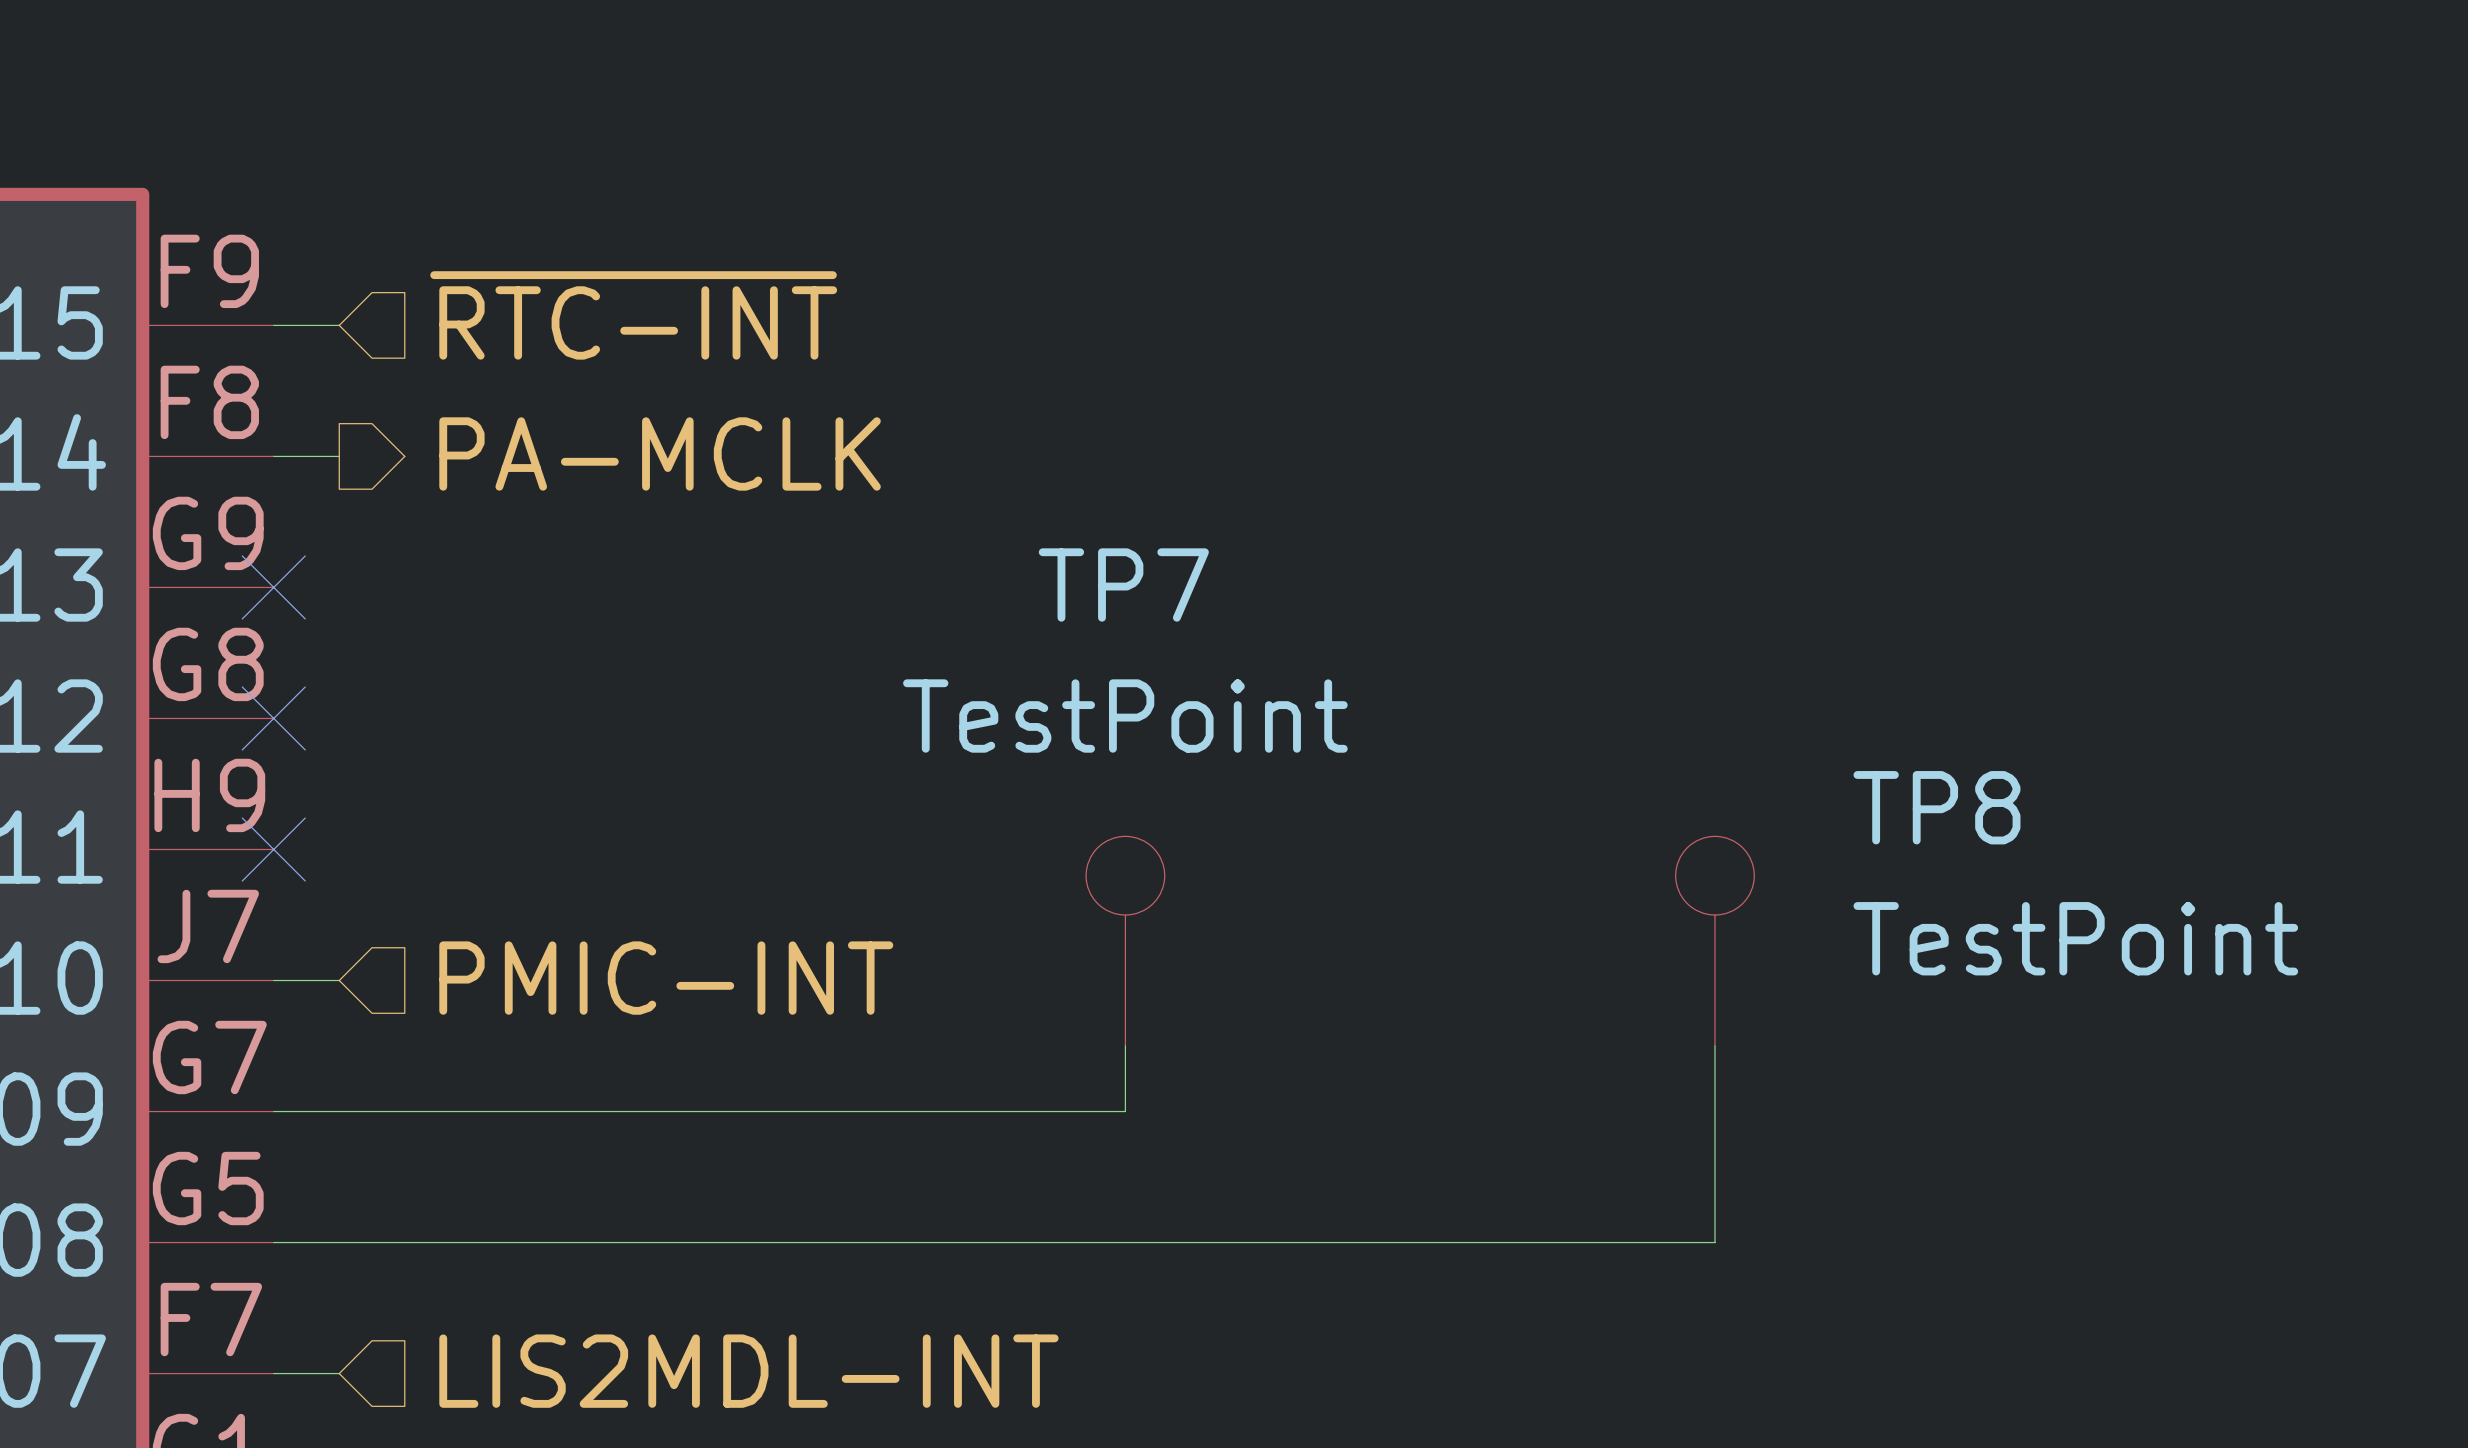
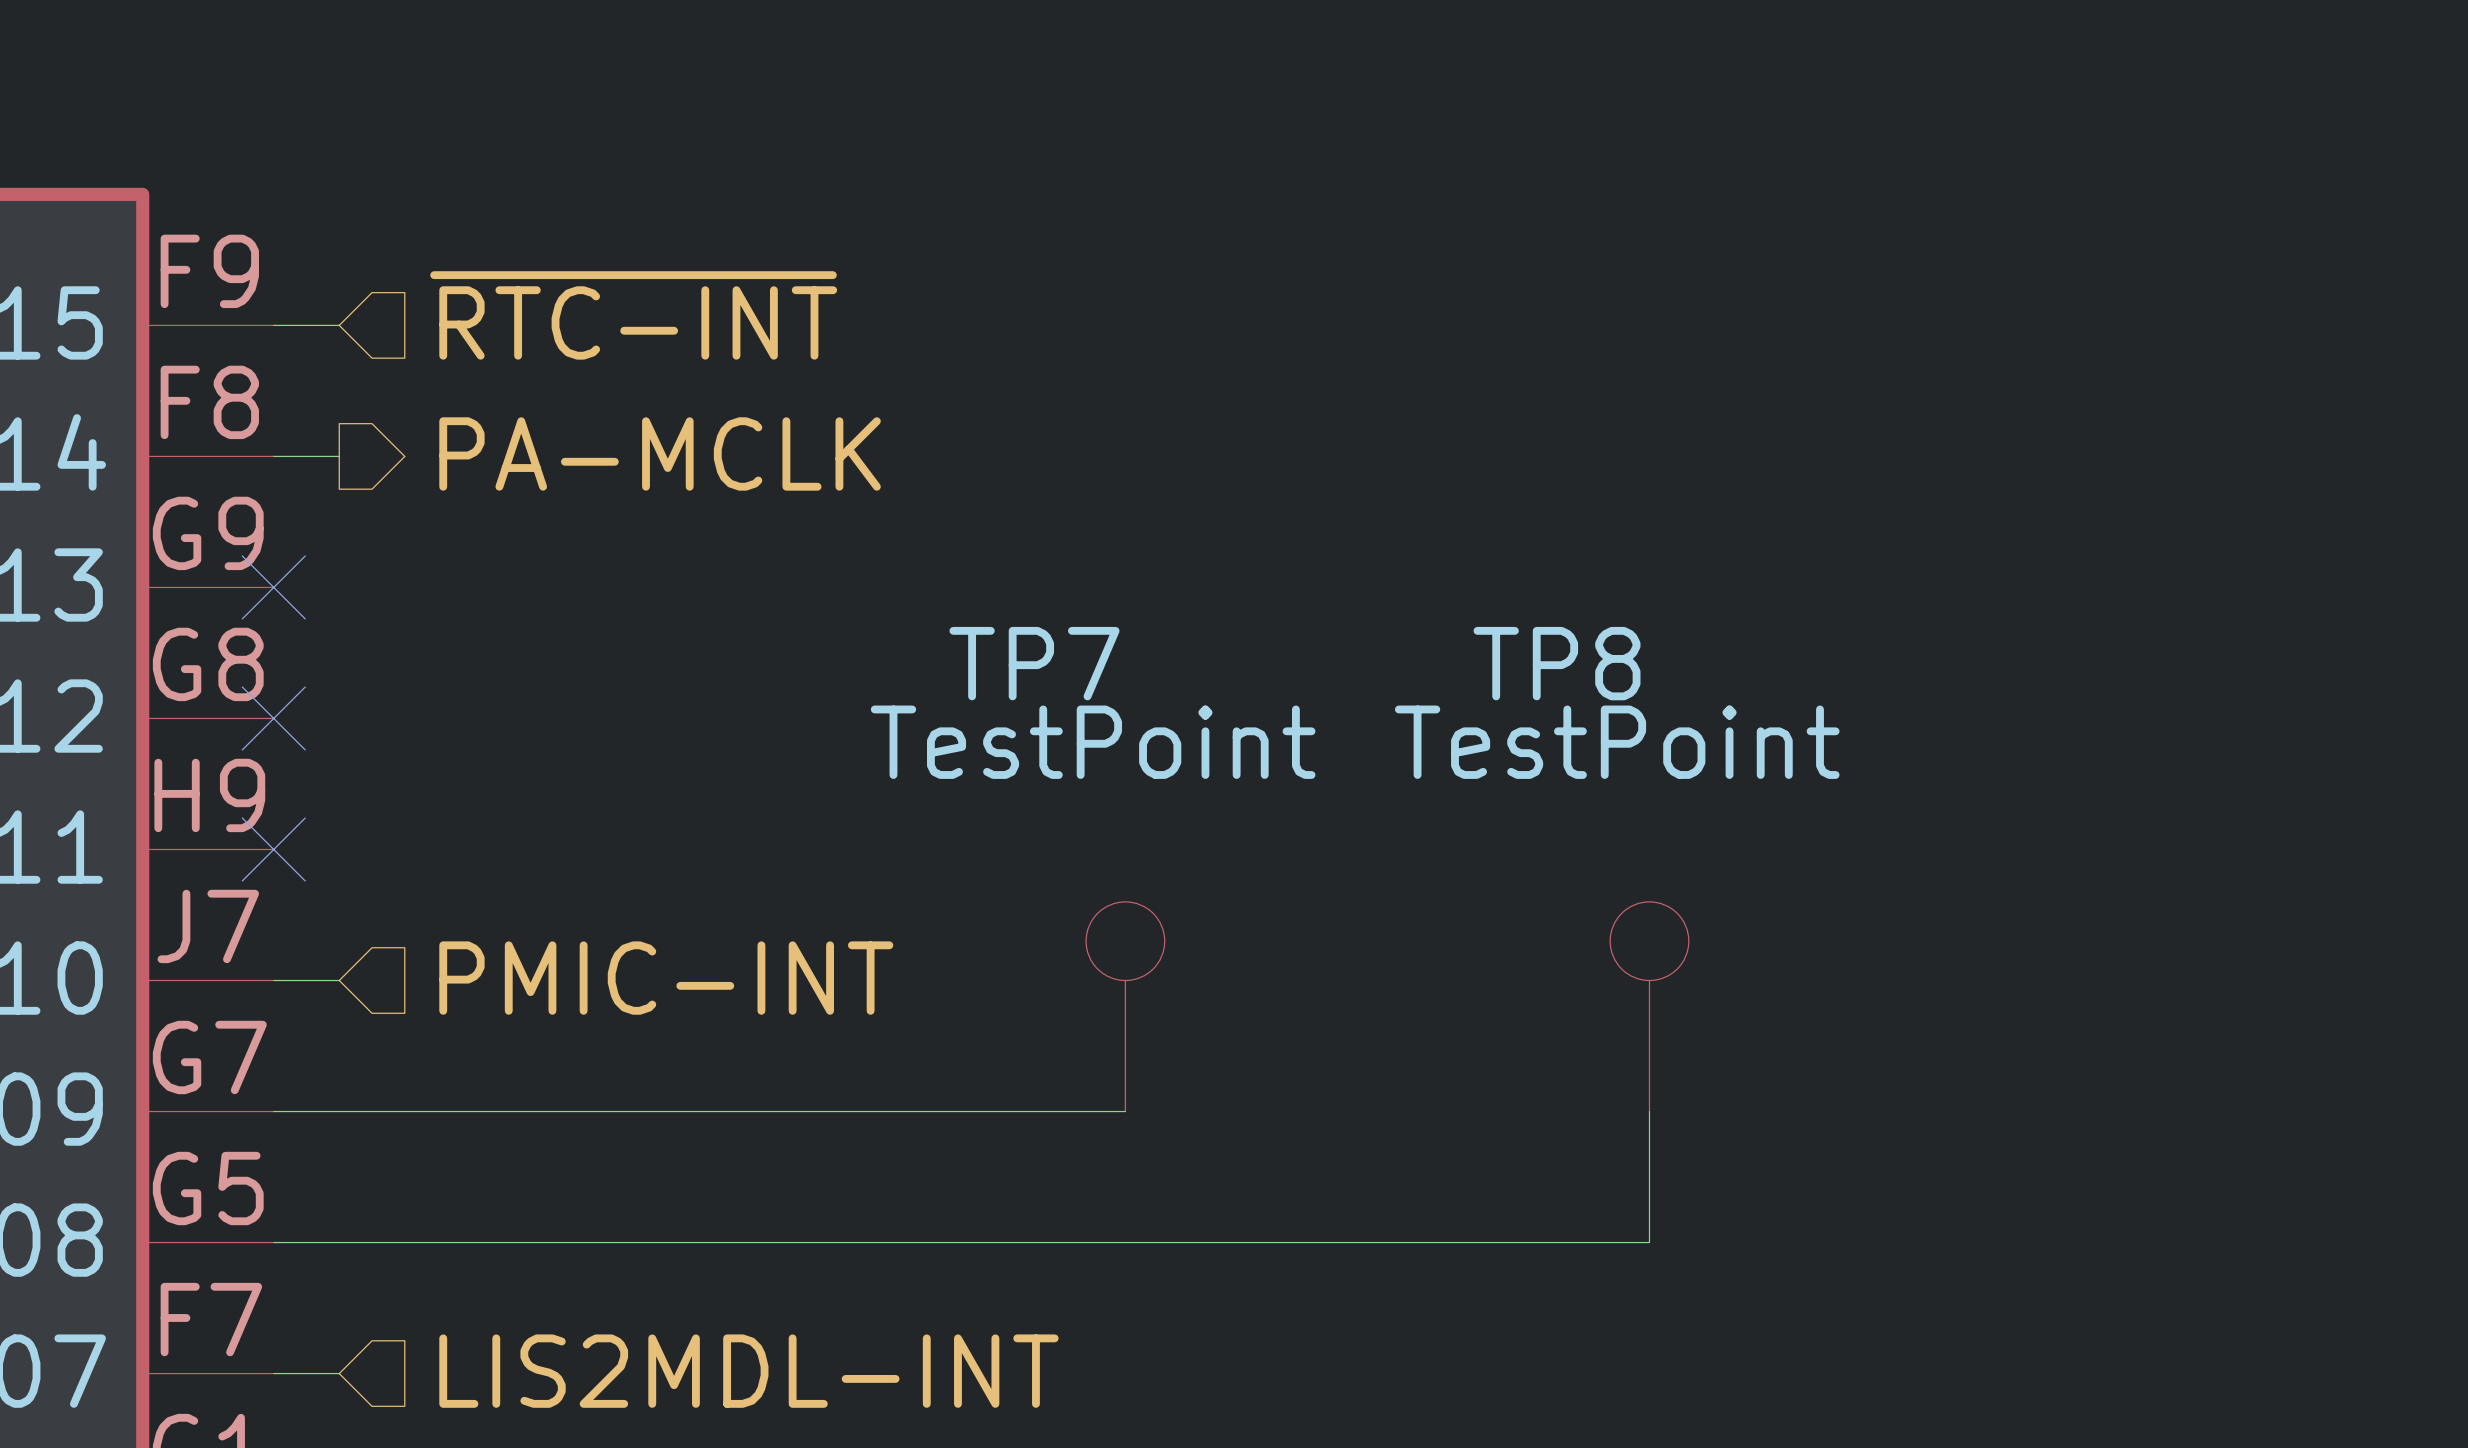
TP7 name position: TP7 (1123, 585) -> TP7 (1034, 663)
TP7 value position: TestPoint (1125, 716) -> TestPoint (1093, 742)
TP8 name position: TP8 (1936, 807) -> TP8 (1557, 663)
TP8 value position: TestPoint (2075, 938) -> TestPoint (1617, 742)
TP7 position: (1125, 941) -> (1125, 1006)
TP8 position: (1714, 941) -> (1649, 1006)
wire: (1714, 1046) (1714, 1242) (1649, 1242) -> (1649, 1111) (1649, 1242)

